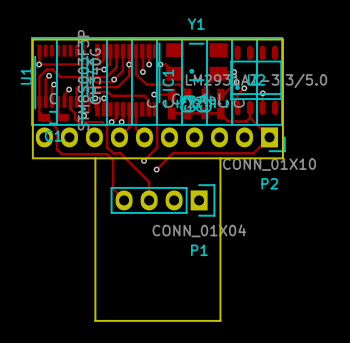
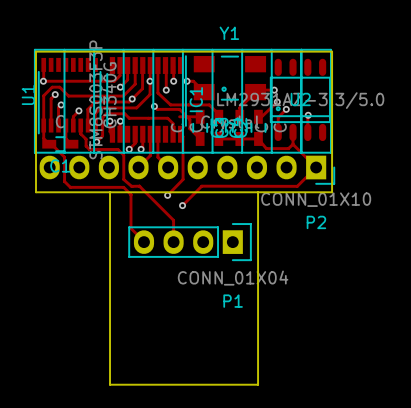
via position: (154, 94) -> (154, 106)
track: (171, 113) (187, 113) -> (200, 138) (189, 128) (189, 119) (179, 109) (157, 109) (154, 106)

